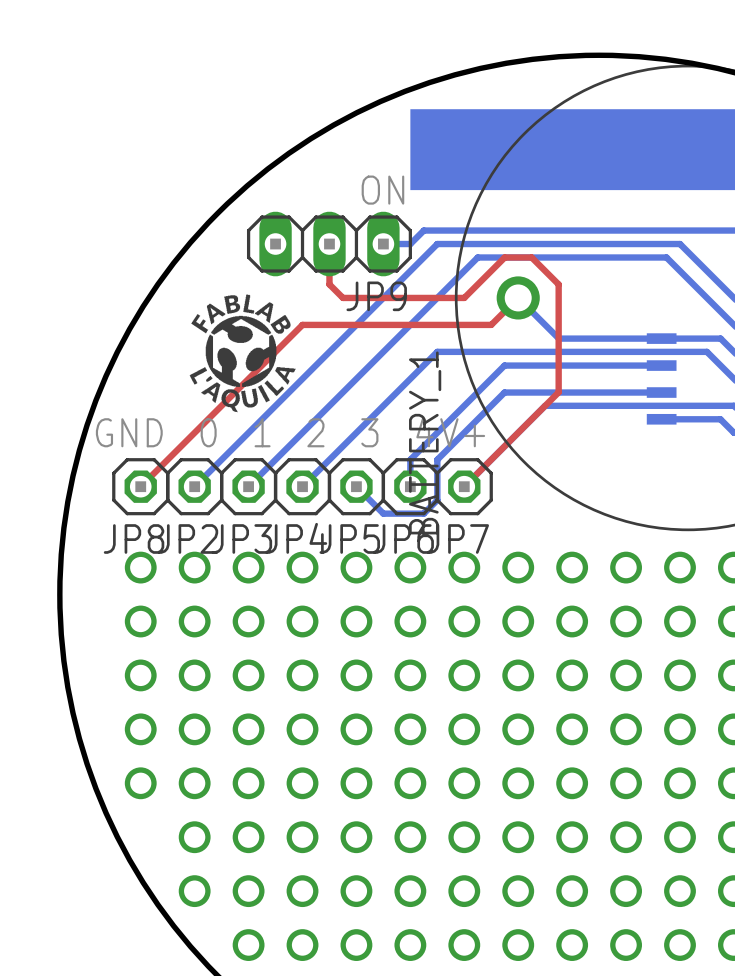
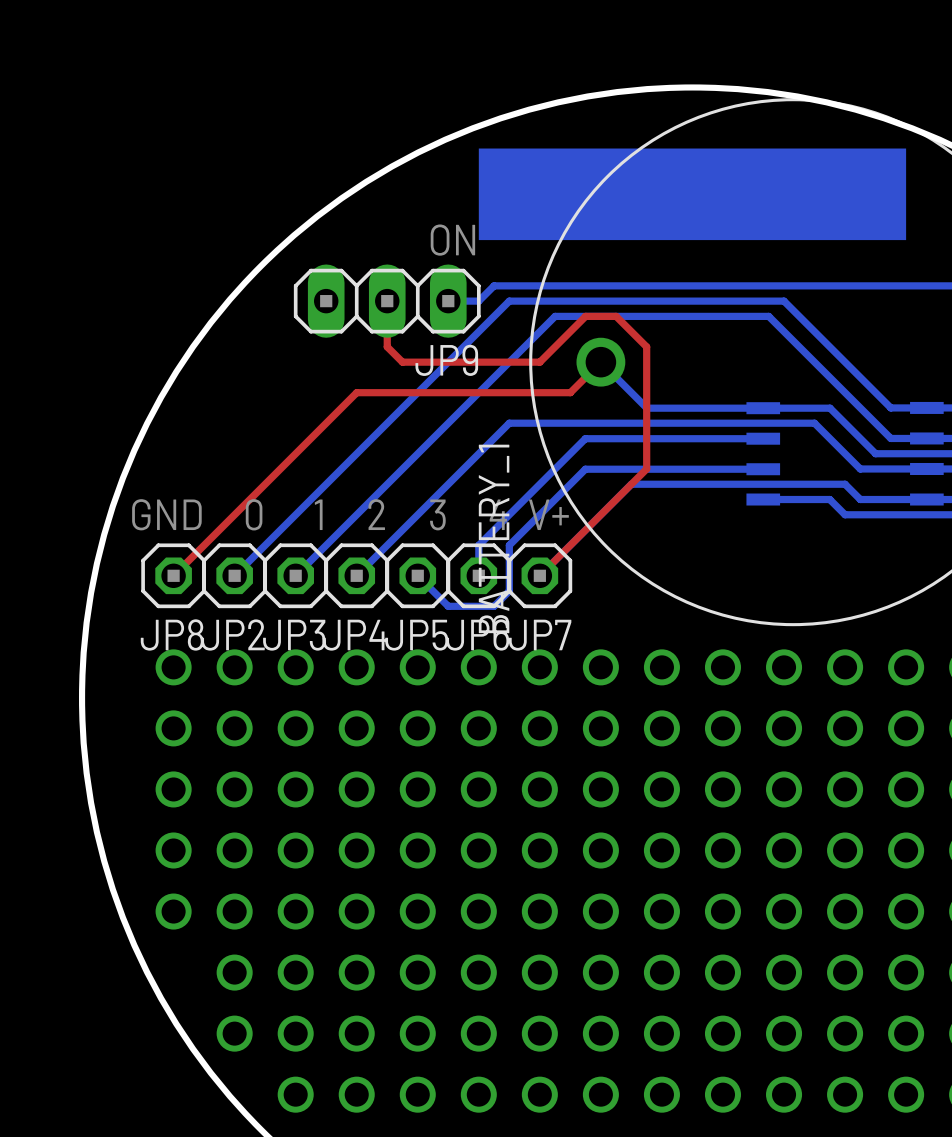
drawing: [189, 294, 296, 413] -> none

